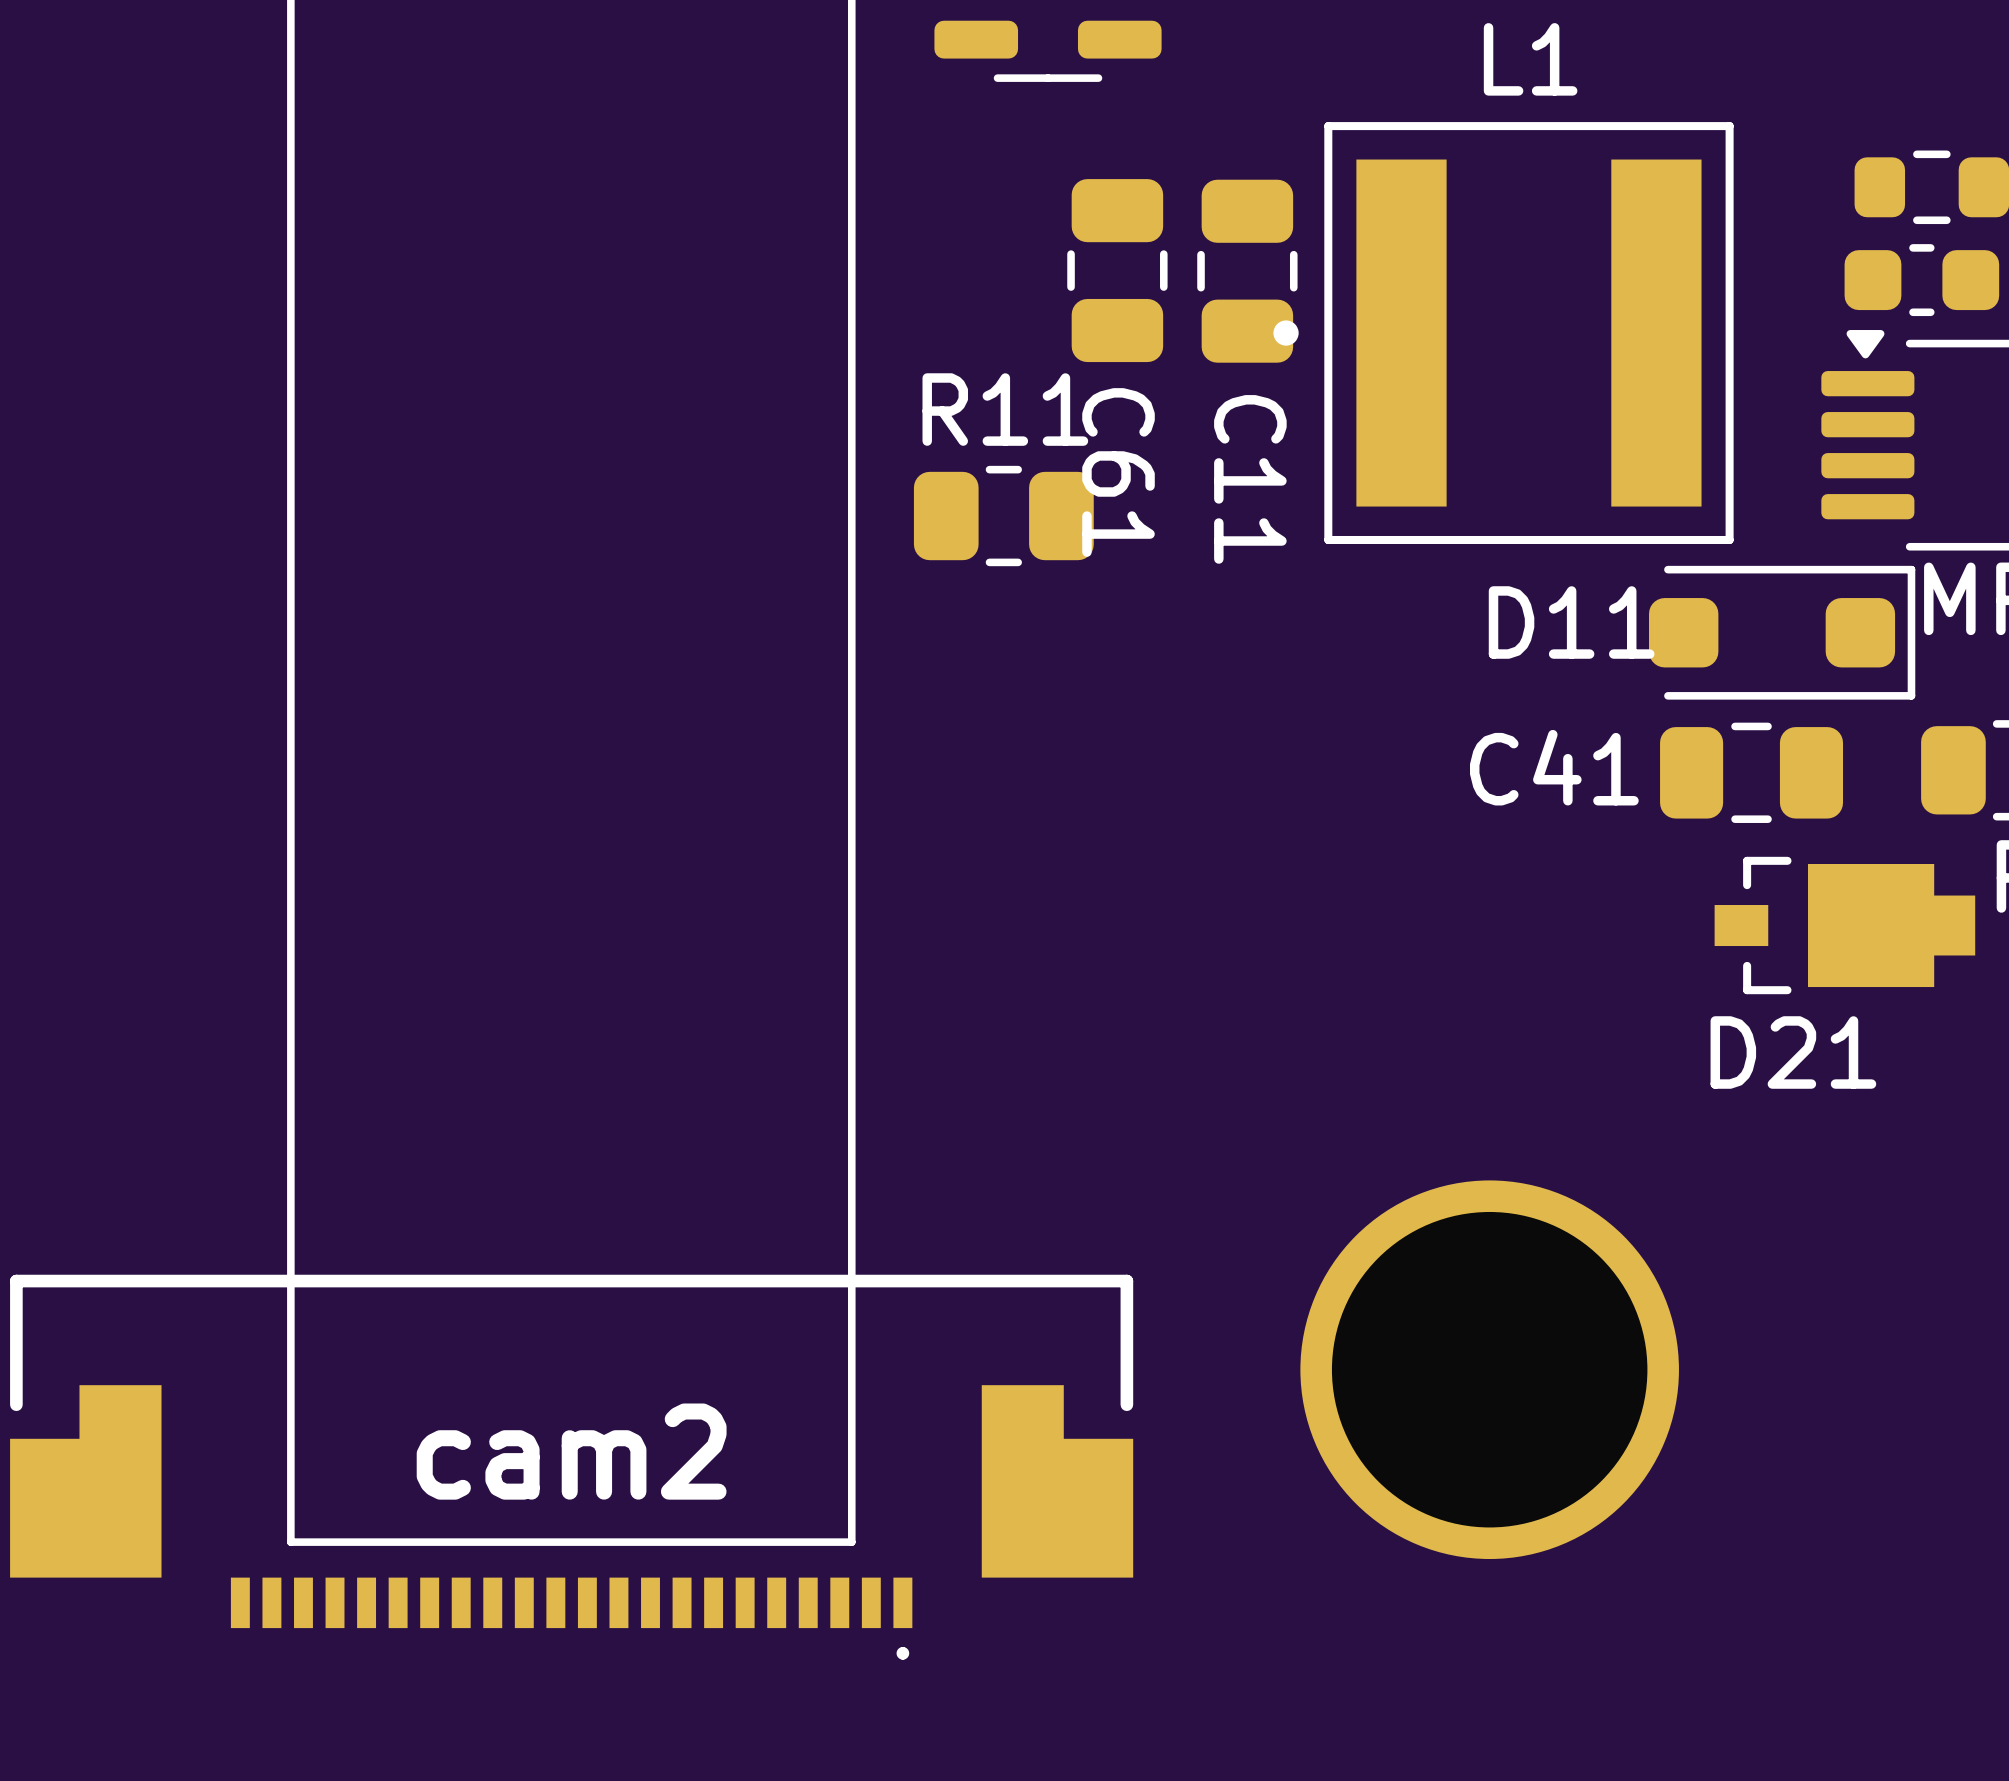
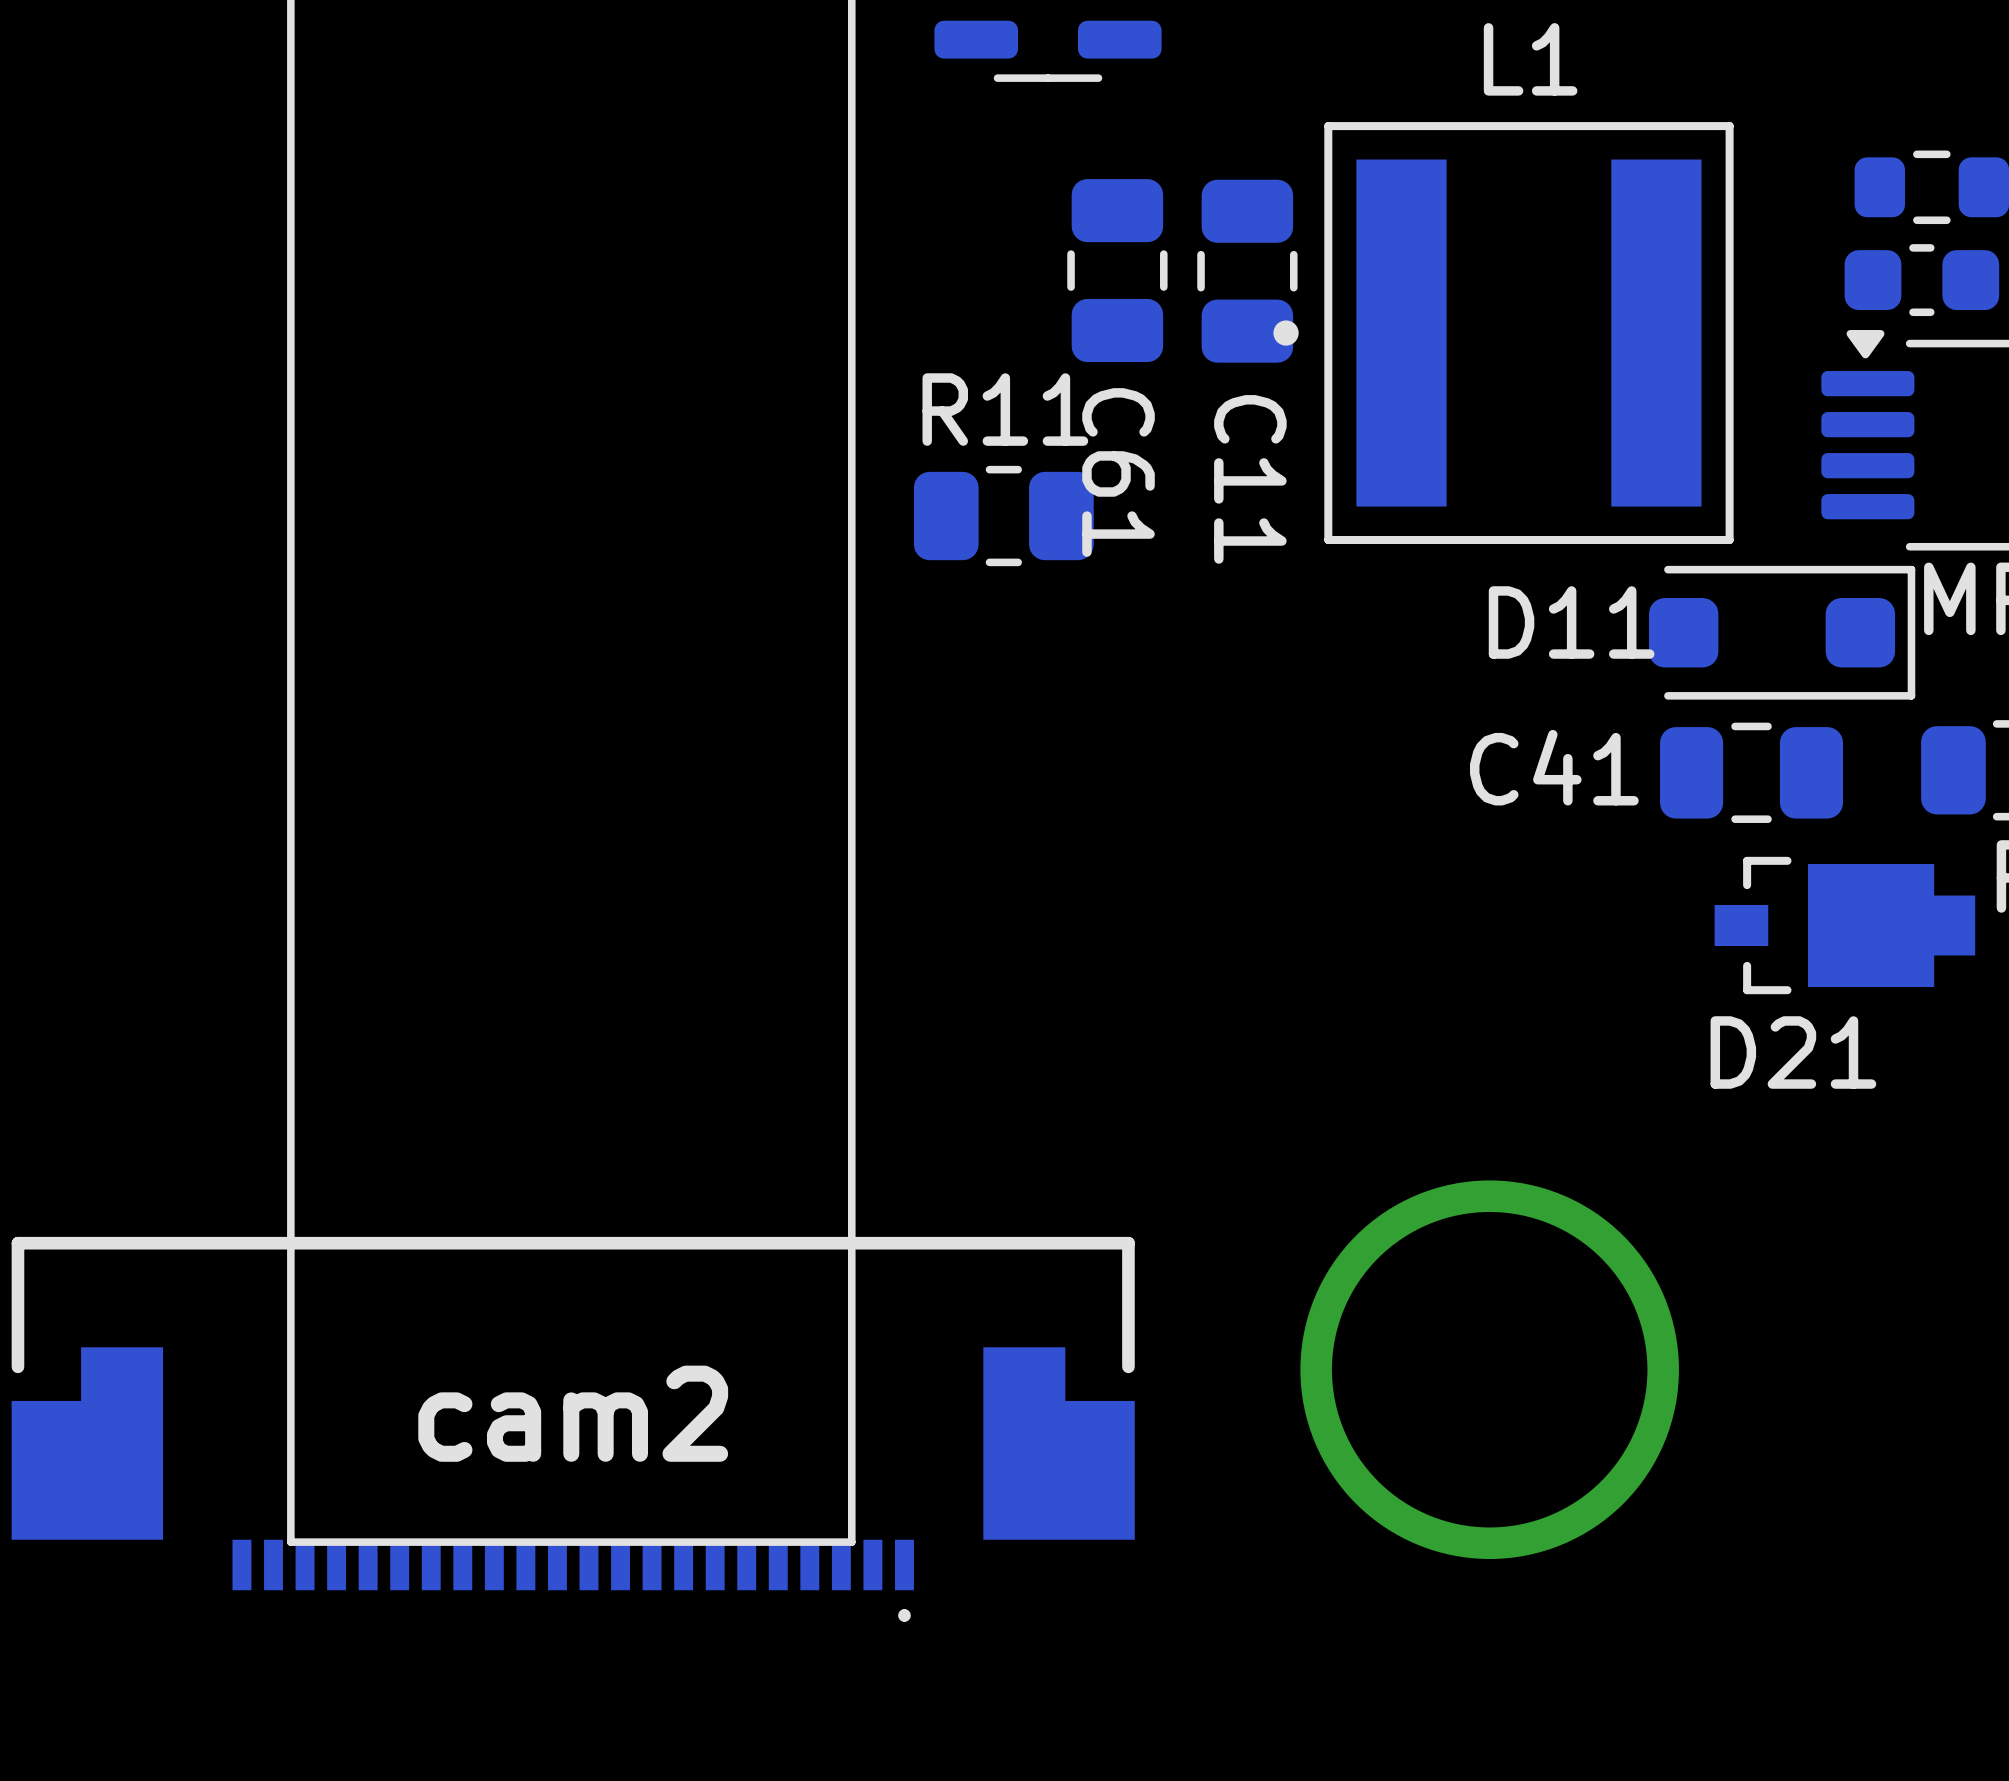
cam2 position: (571, 1467) -> (573, 1429)

